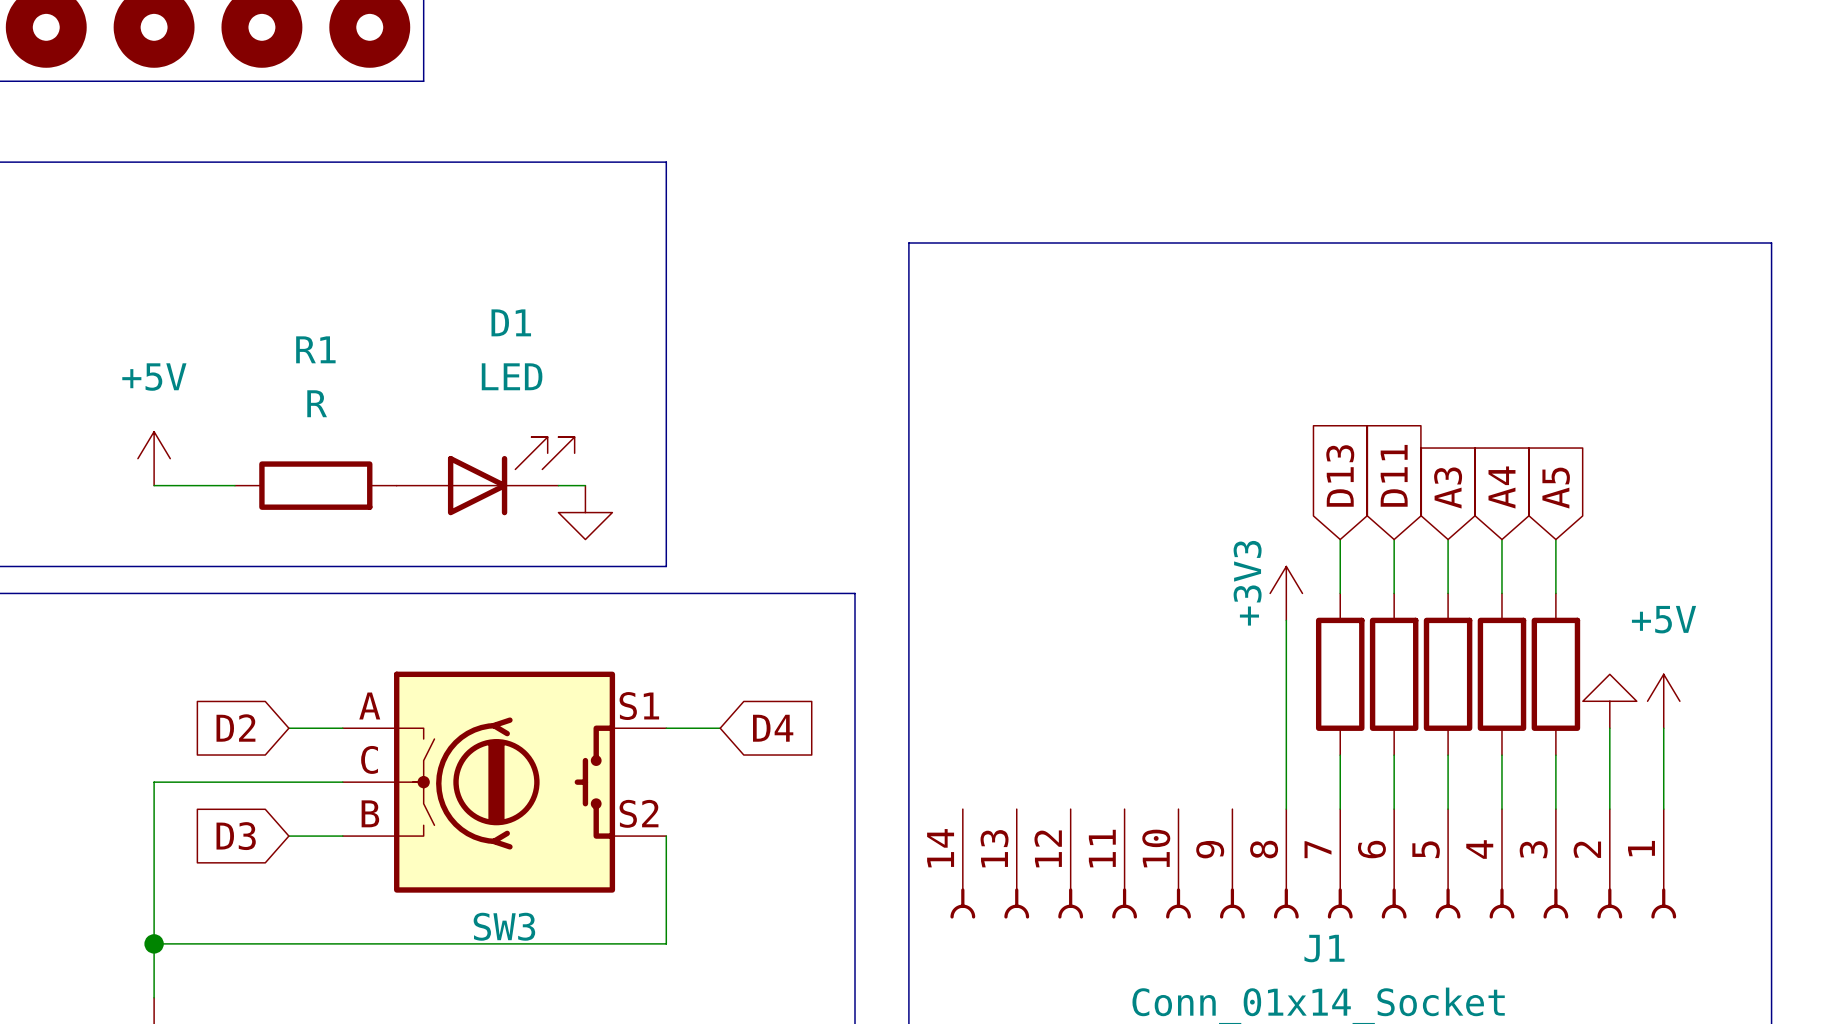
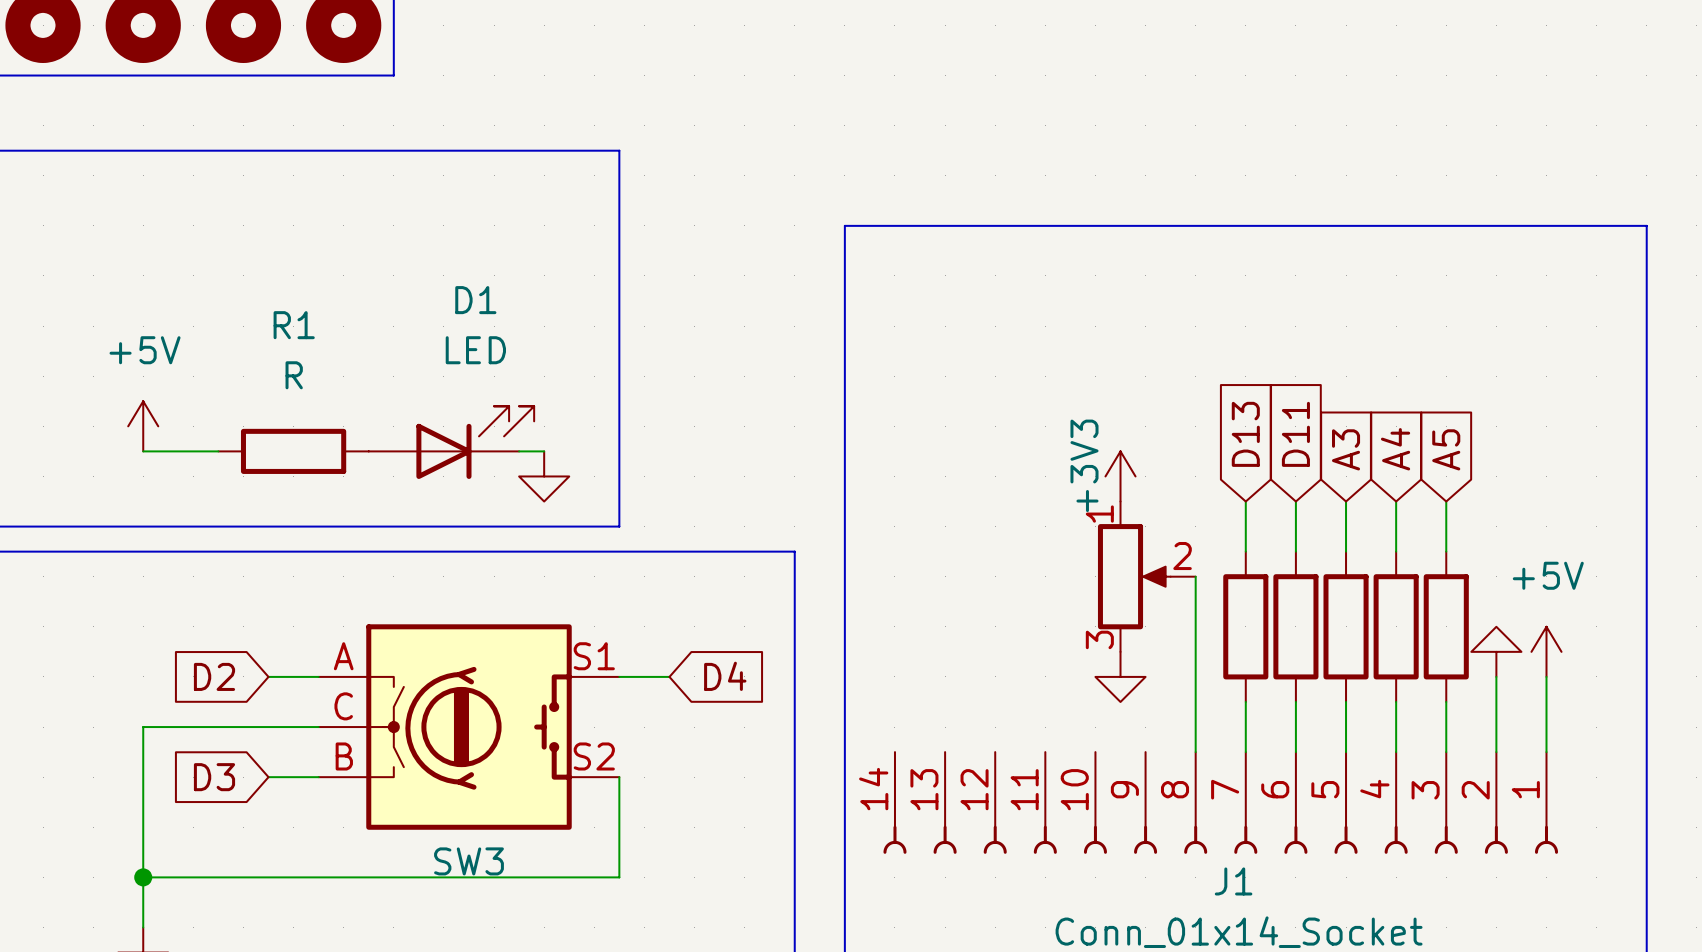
power symbol position: +3V3 (1286, 593) -> +3V3 (1120, 476)
part: none -> (1146, 576)
power symbol: none -> (1120, 676)

